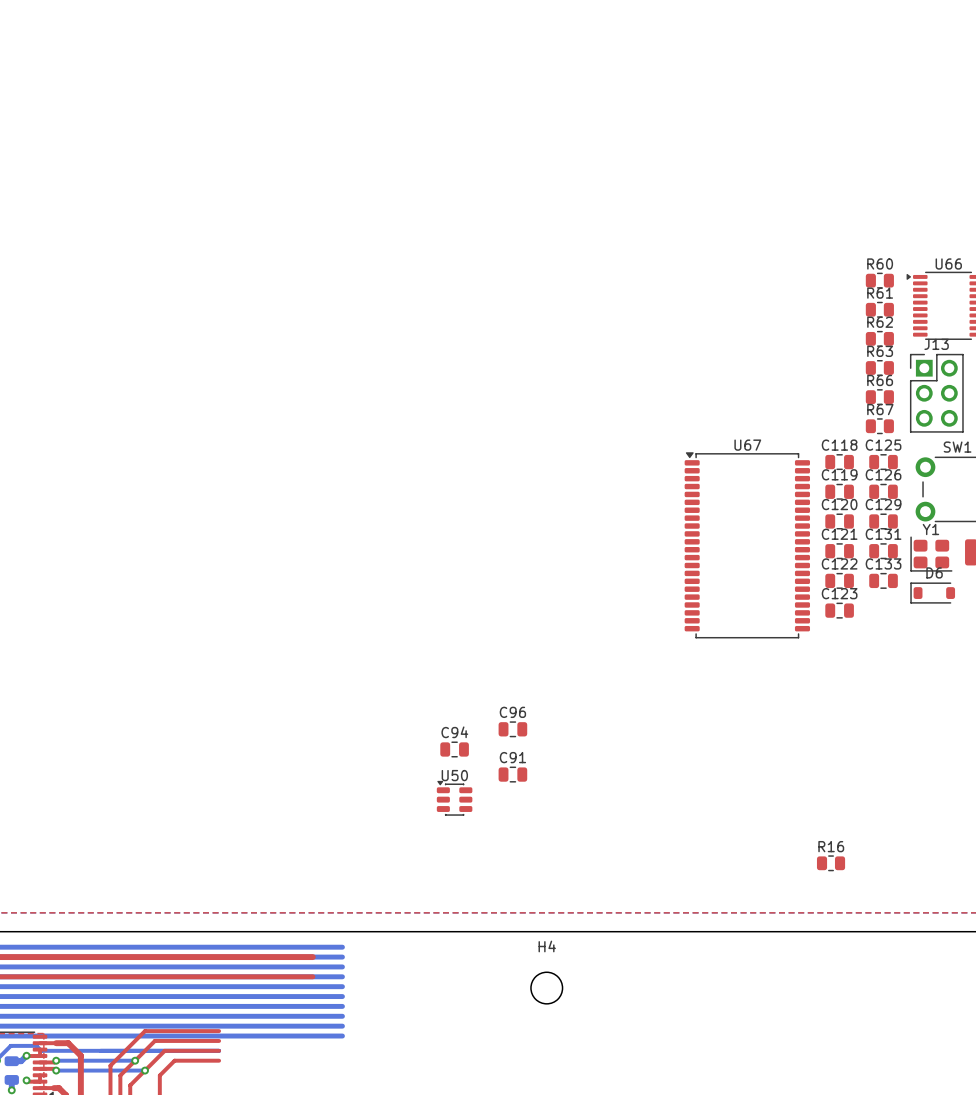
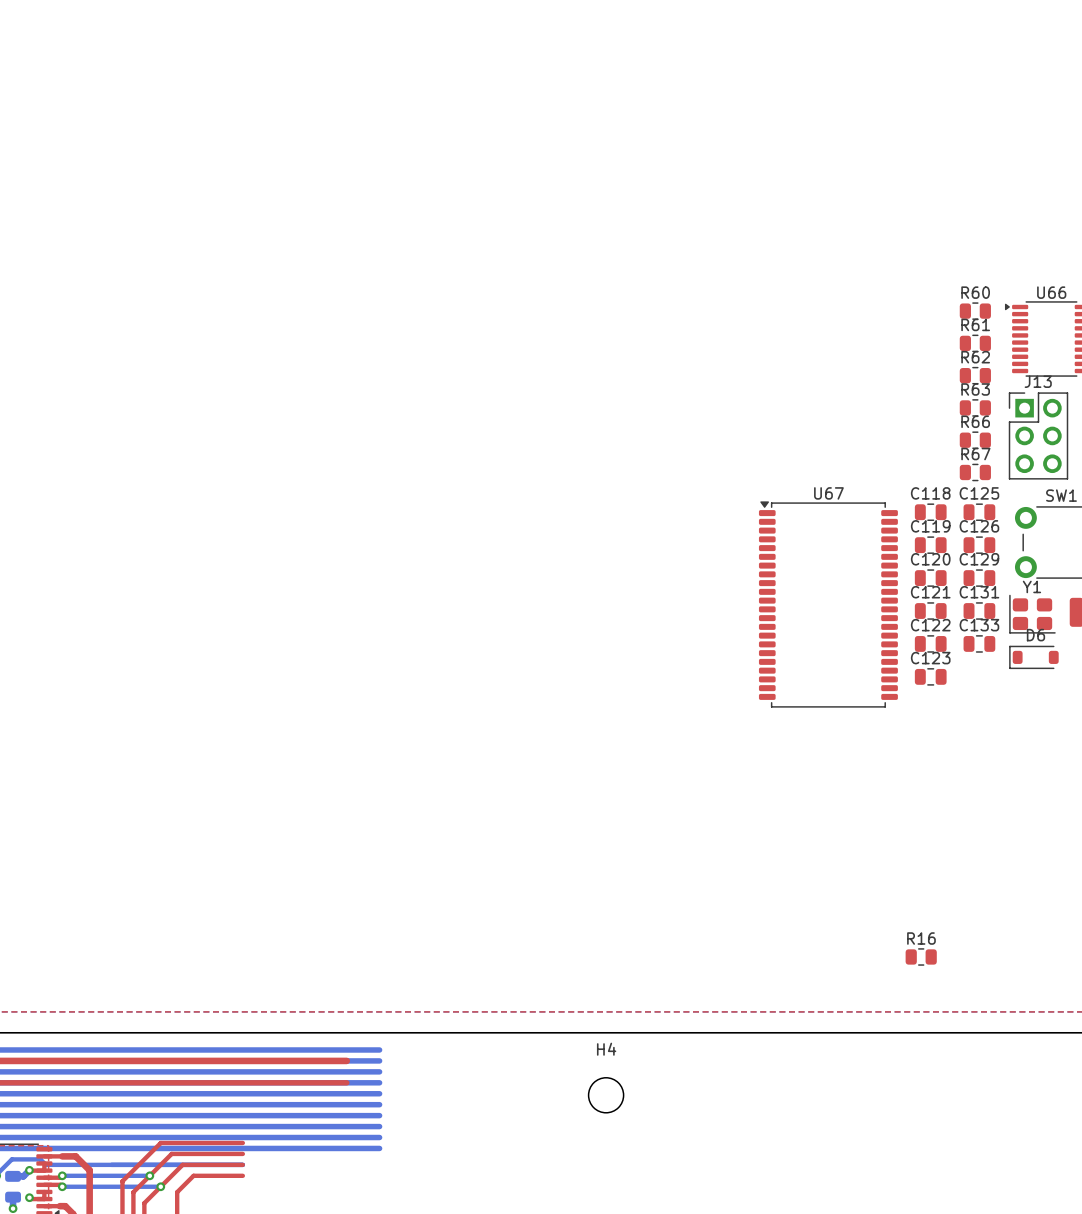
C96: (512, 729) -> none
C94: (454, 749) -> none
C91: (512, 774) -> none
U50: (454, 798) -> none

